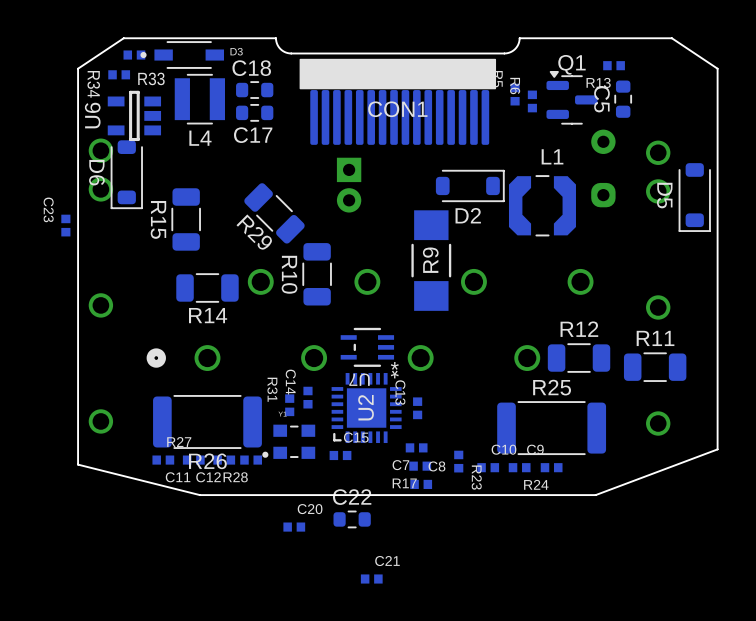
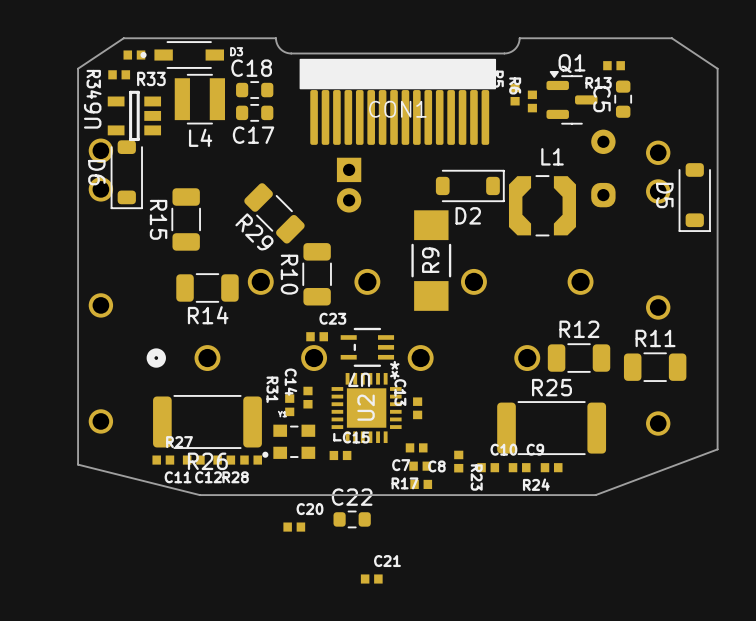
C23 rotation: 0° (65, 225) -> 90° clockwise (317, 336)
C23 position: (65, 225) -> (317, 336)

